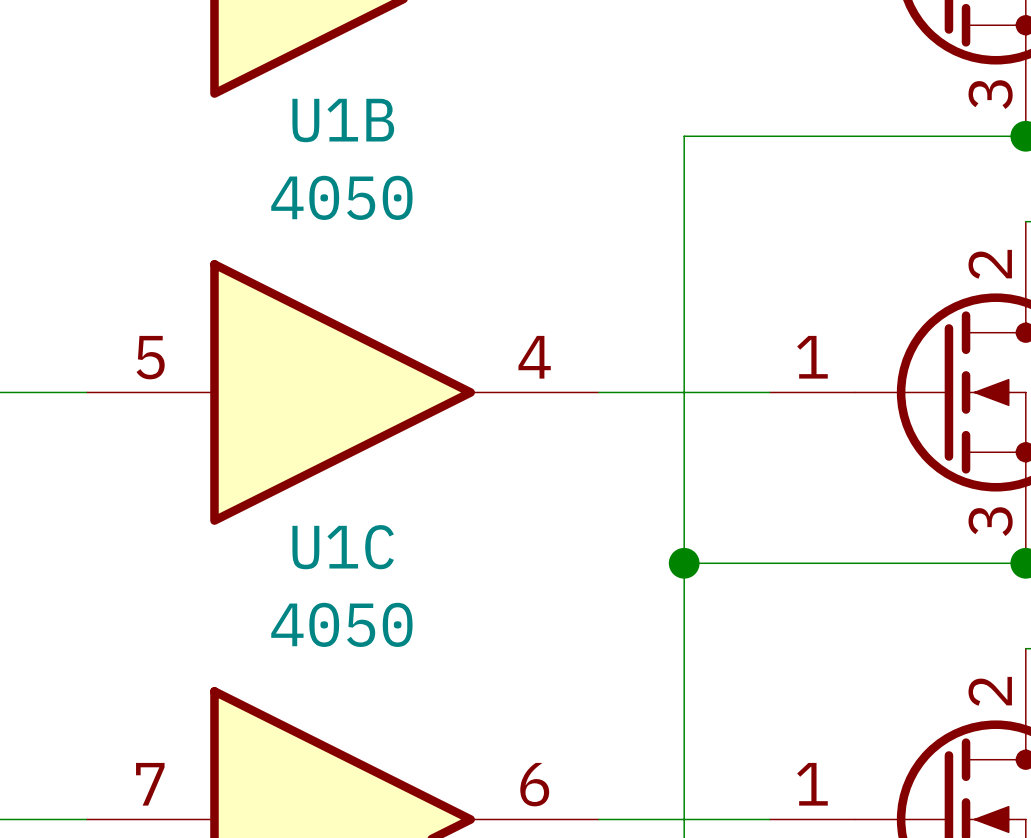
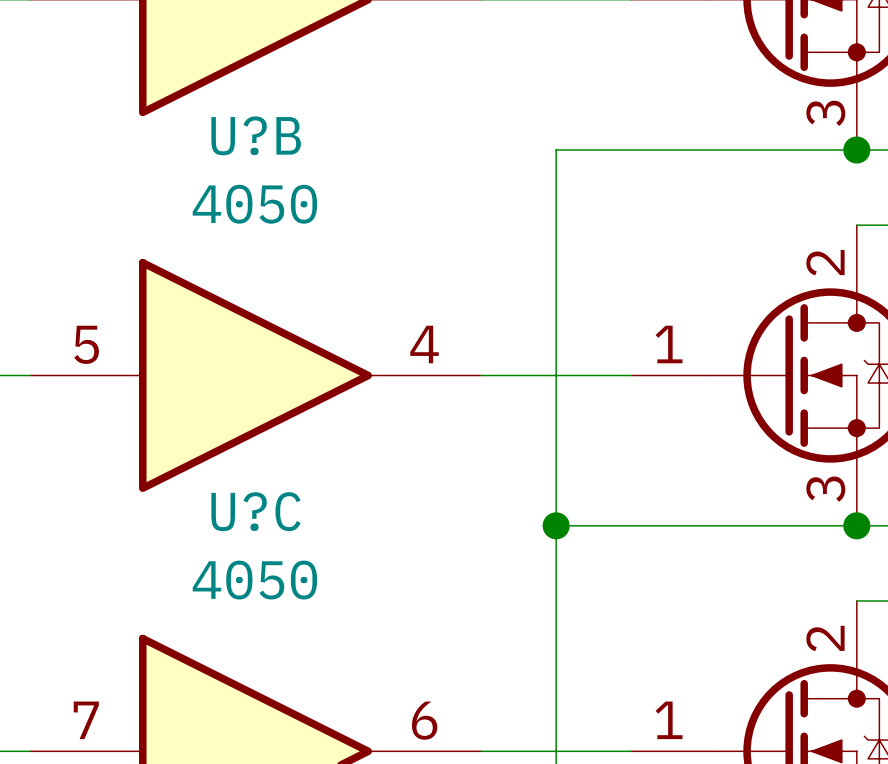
U1B name: U1B (343, 120) -> U?B (256, 135)
U1C name: U1C (343, 547) -> U?C (255, 511)

